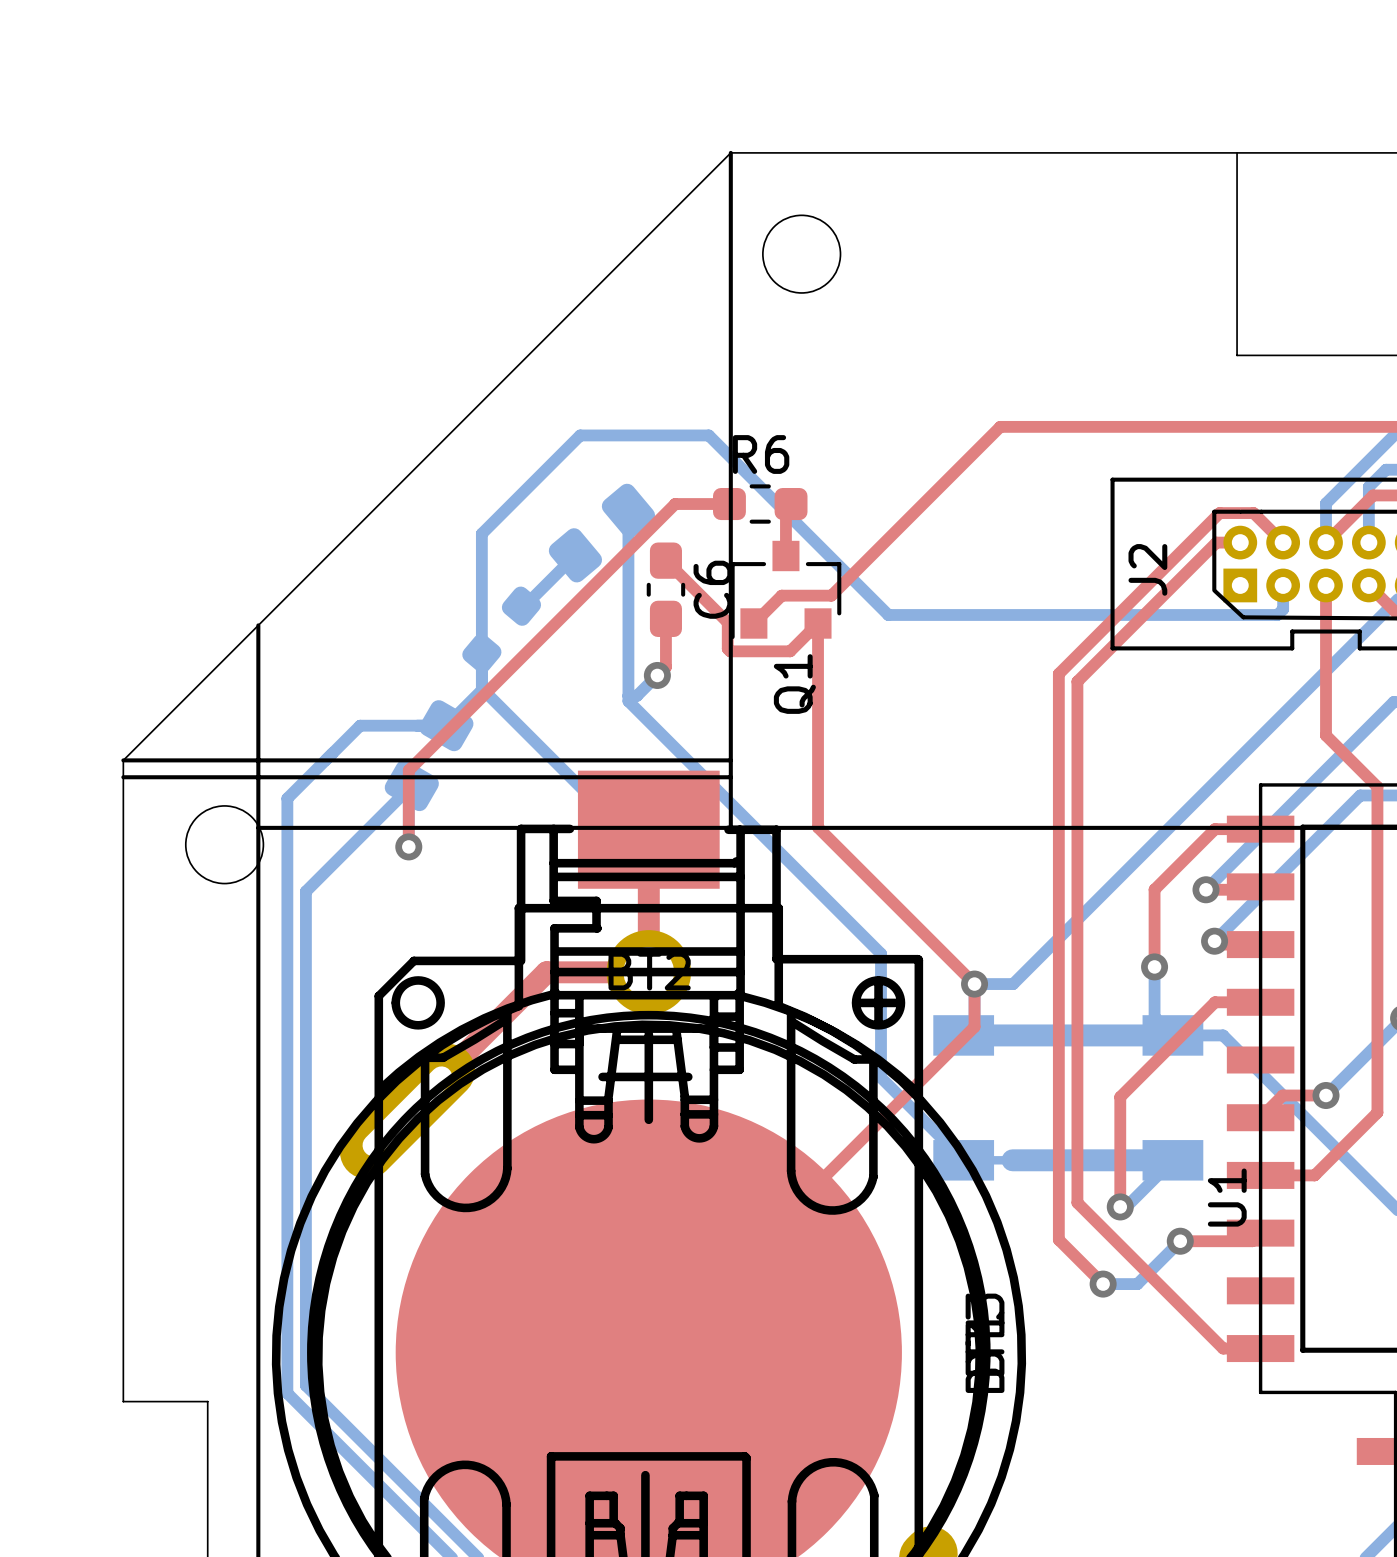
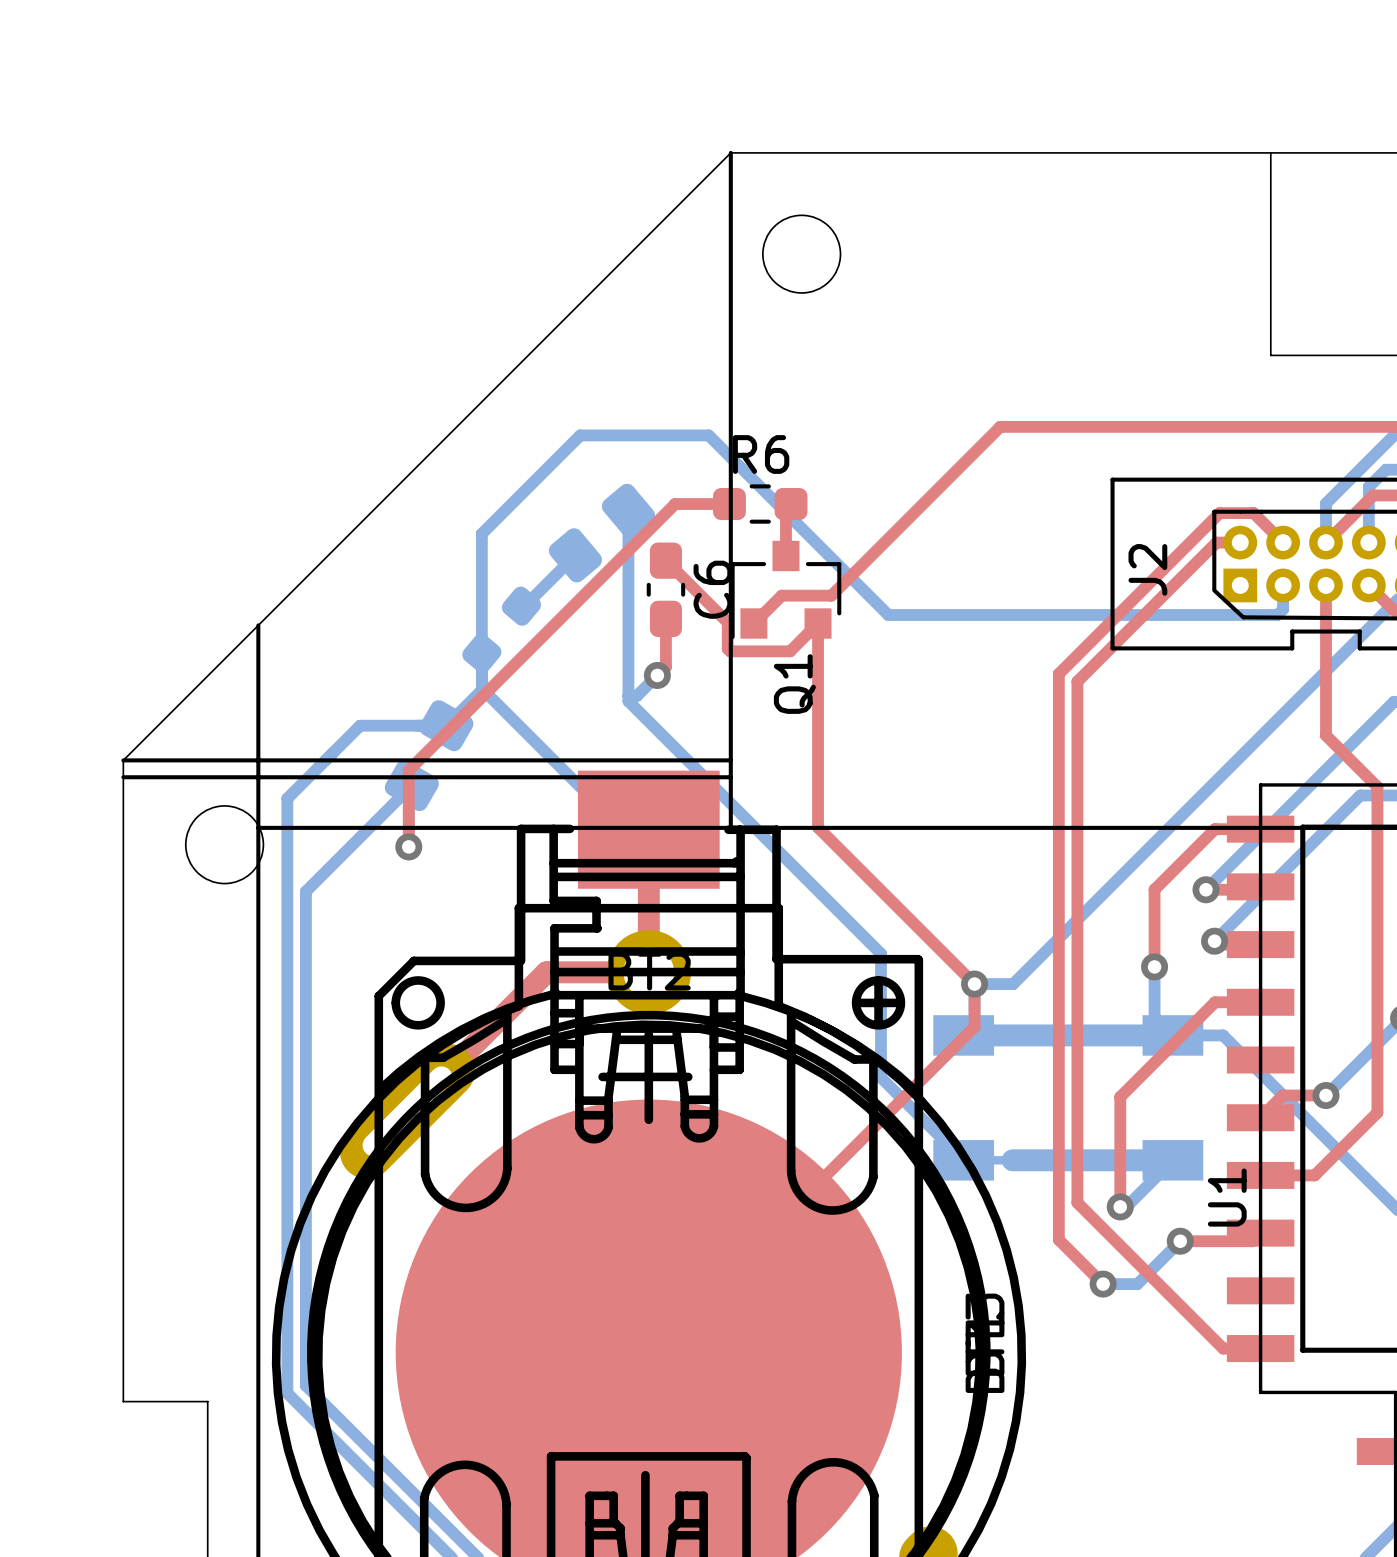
line: (1237, 152) (1237, 355) (1270, 355) -> (1270, 152) (1270, 355)

